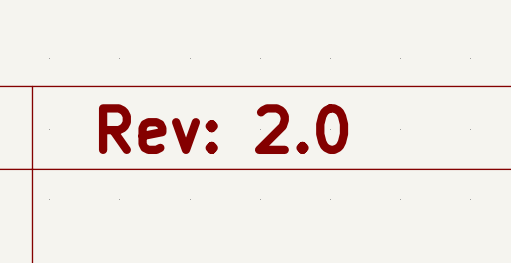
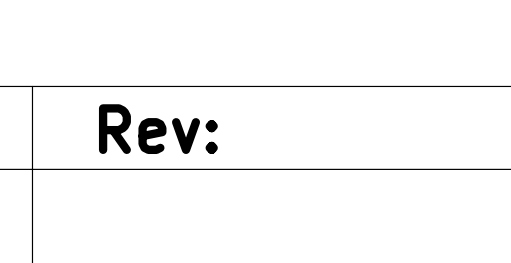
title block: Rev: 2.0 (223, 129) -> Rev: (158, 129)

